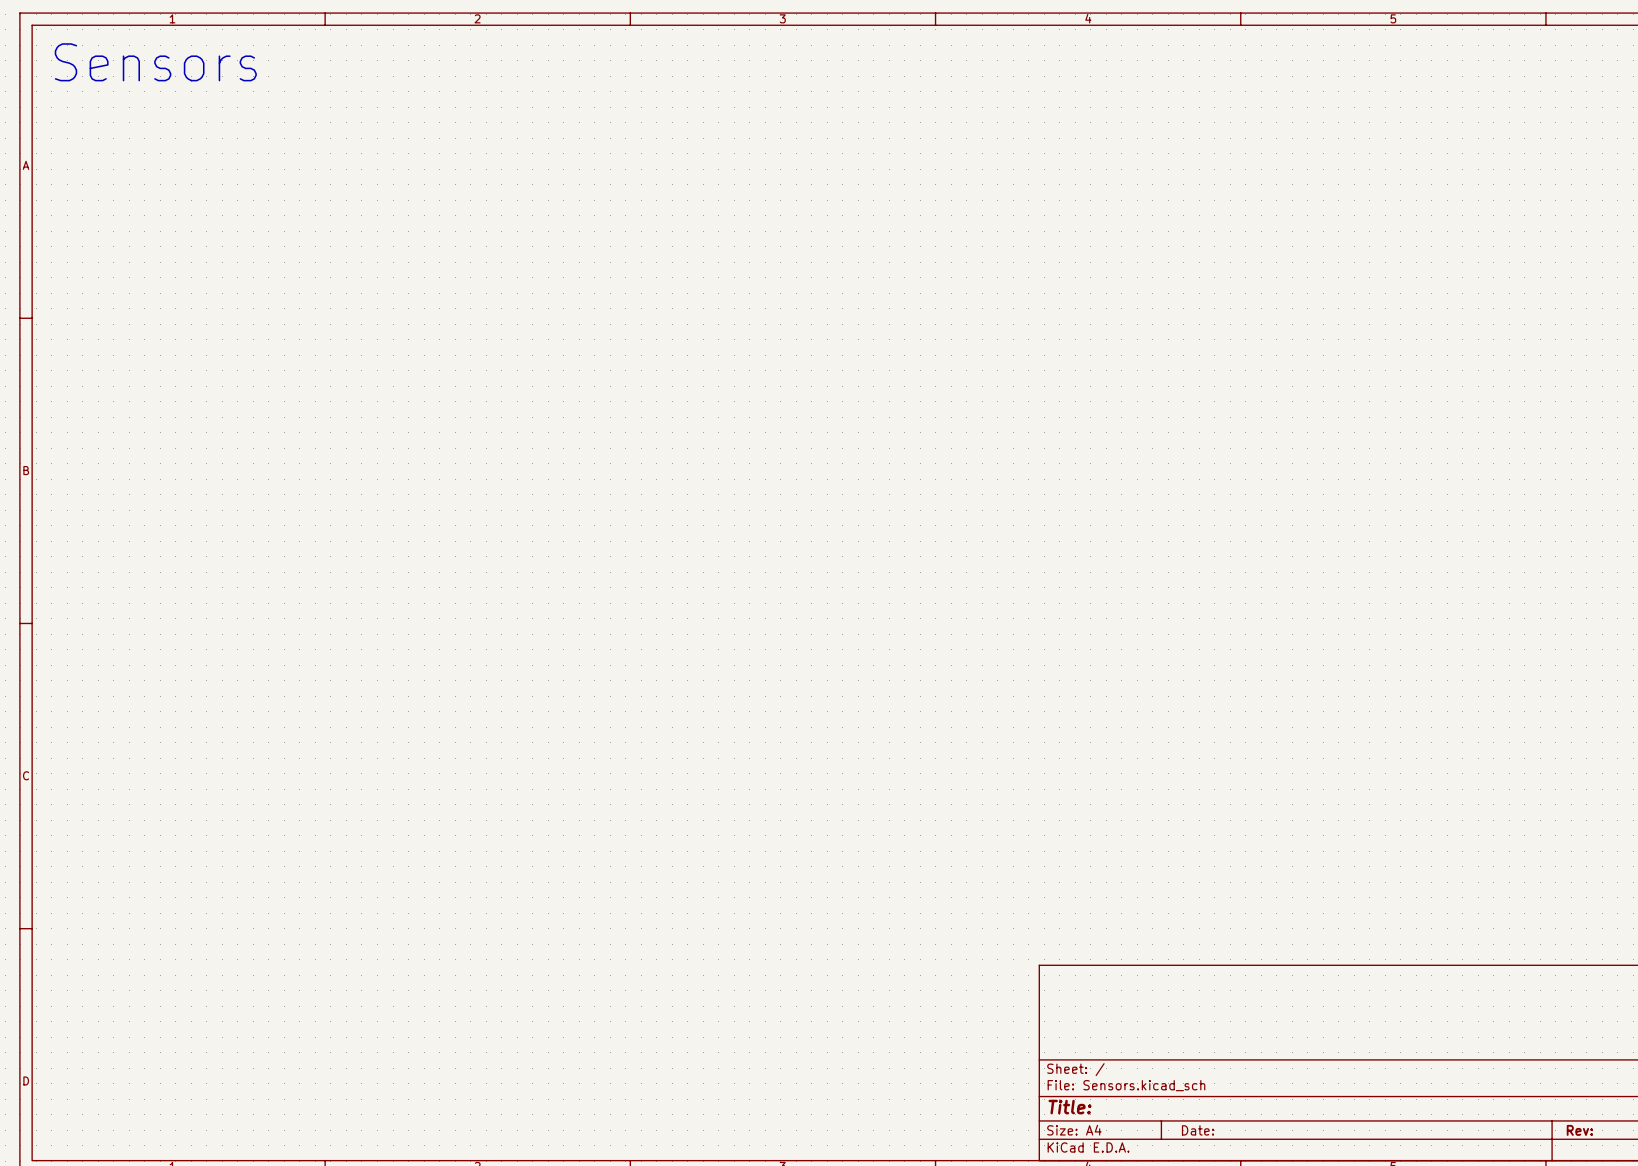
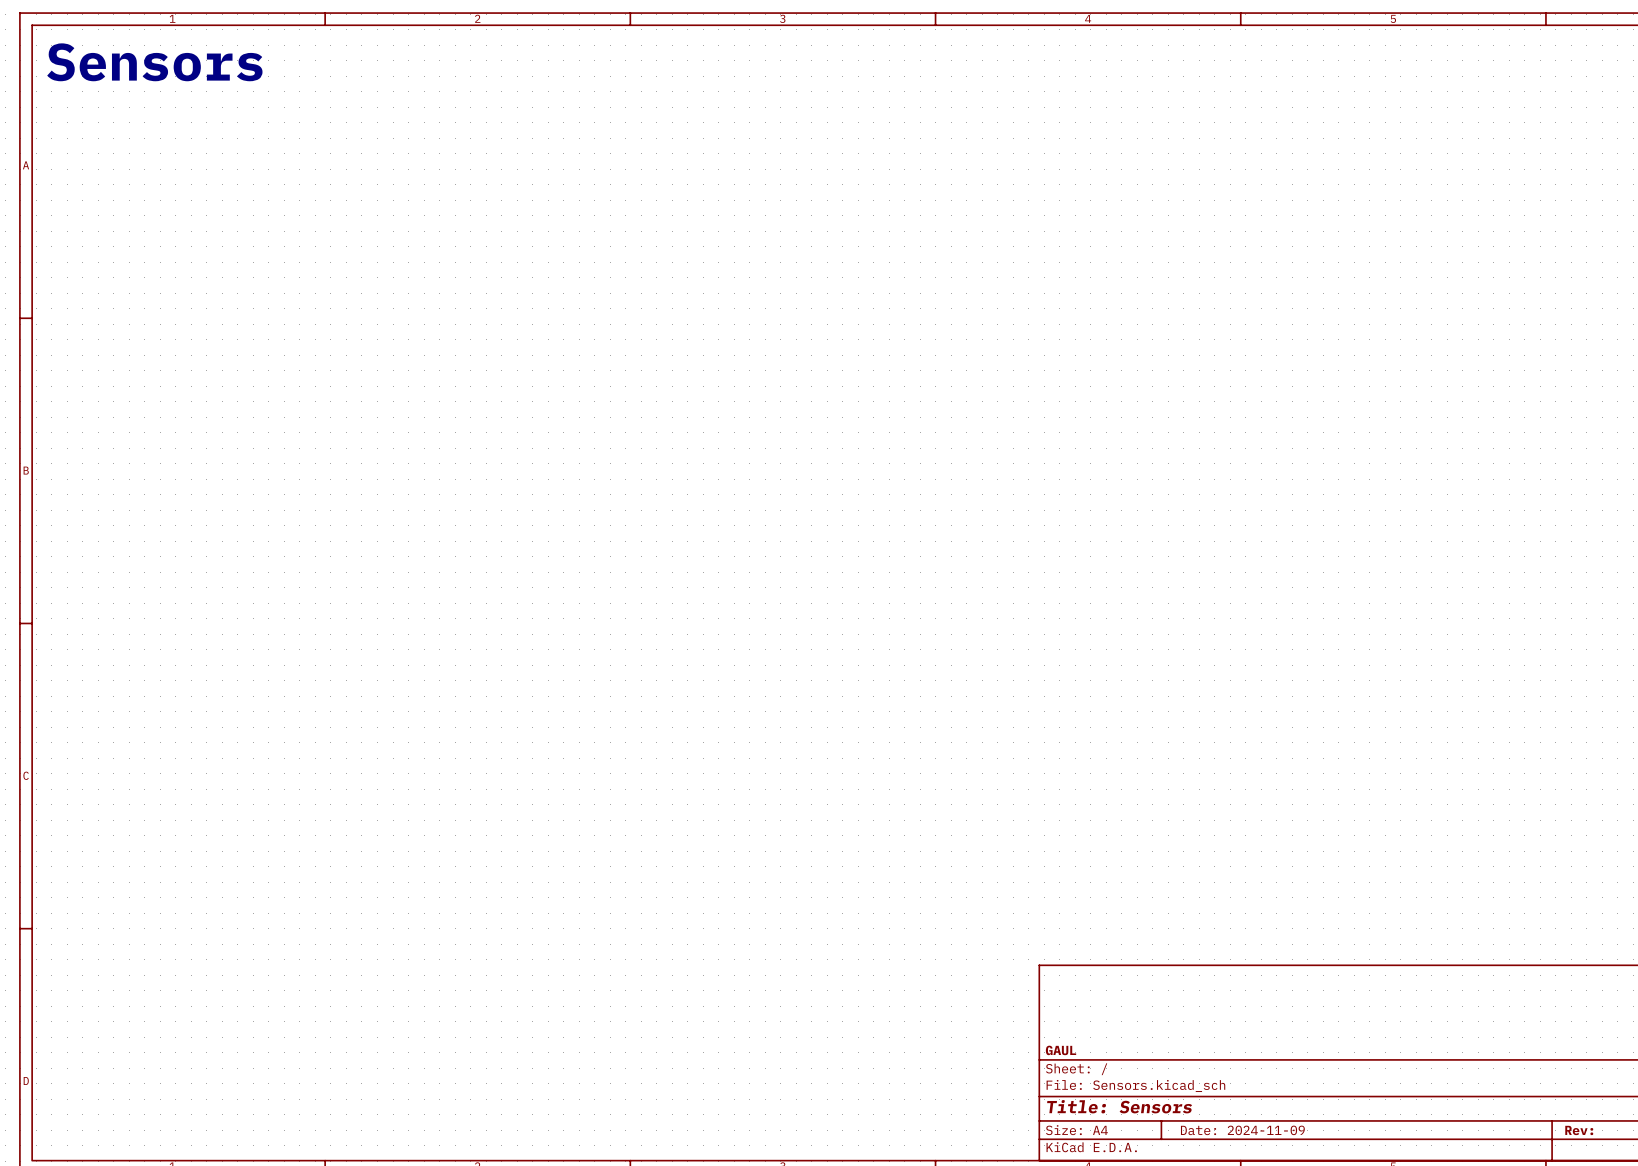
title block: none -> GAUL (1061, 1050)
title block: Title: (1070, 1107) -> Title: Sensors (1119, 1106)
title block: Date: (1197, 1130) -> Date: 2024-11-09 (1242, 1130)

